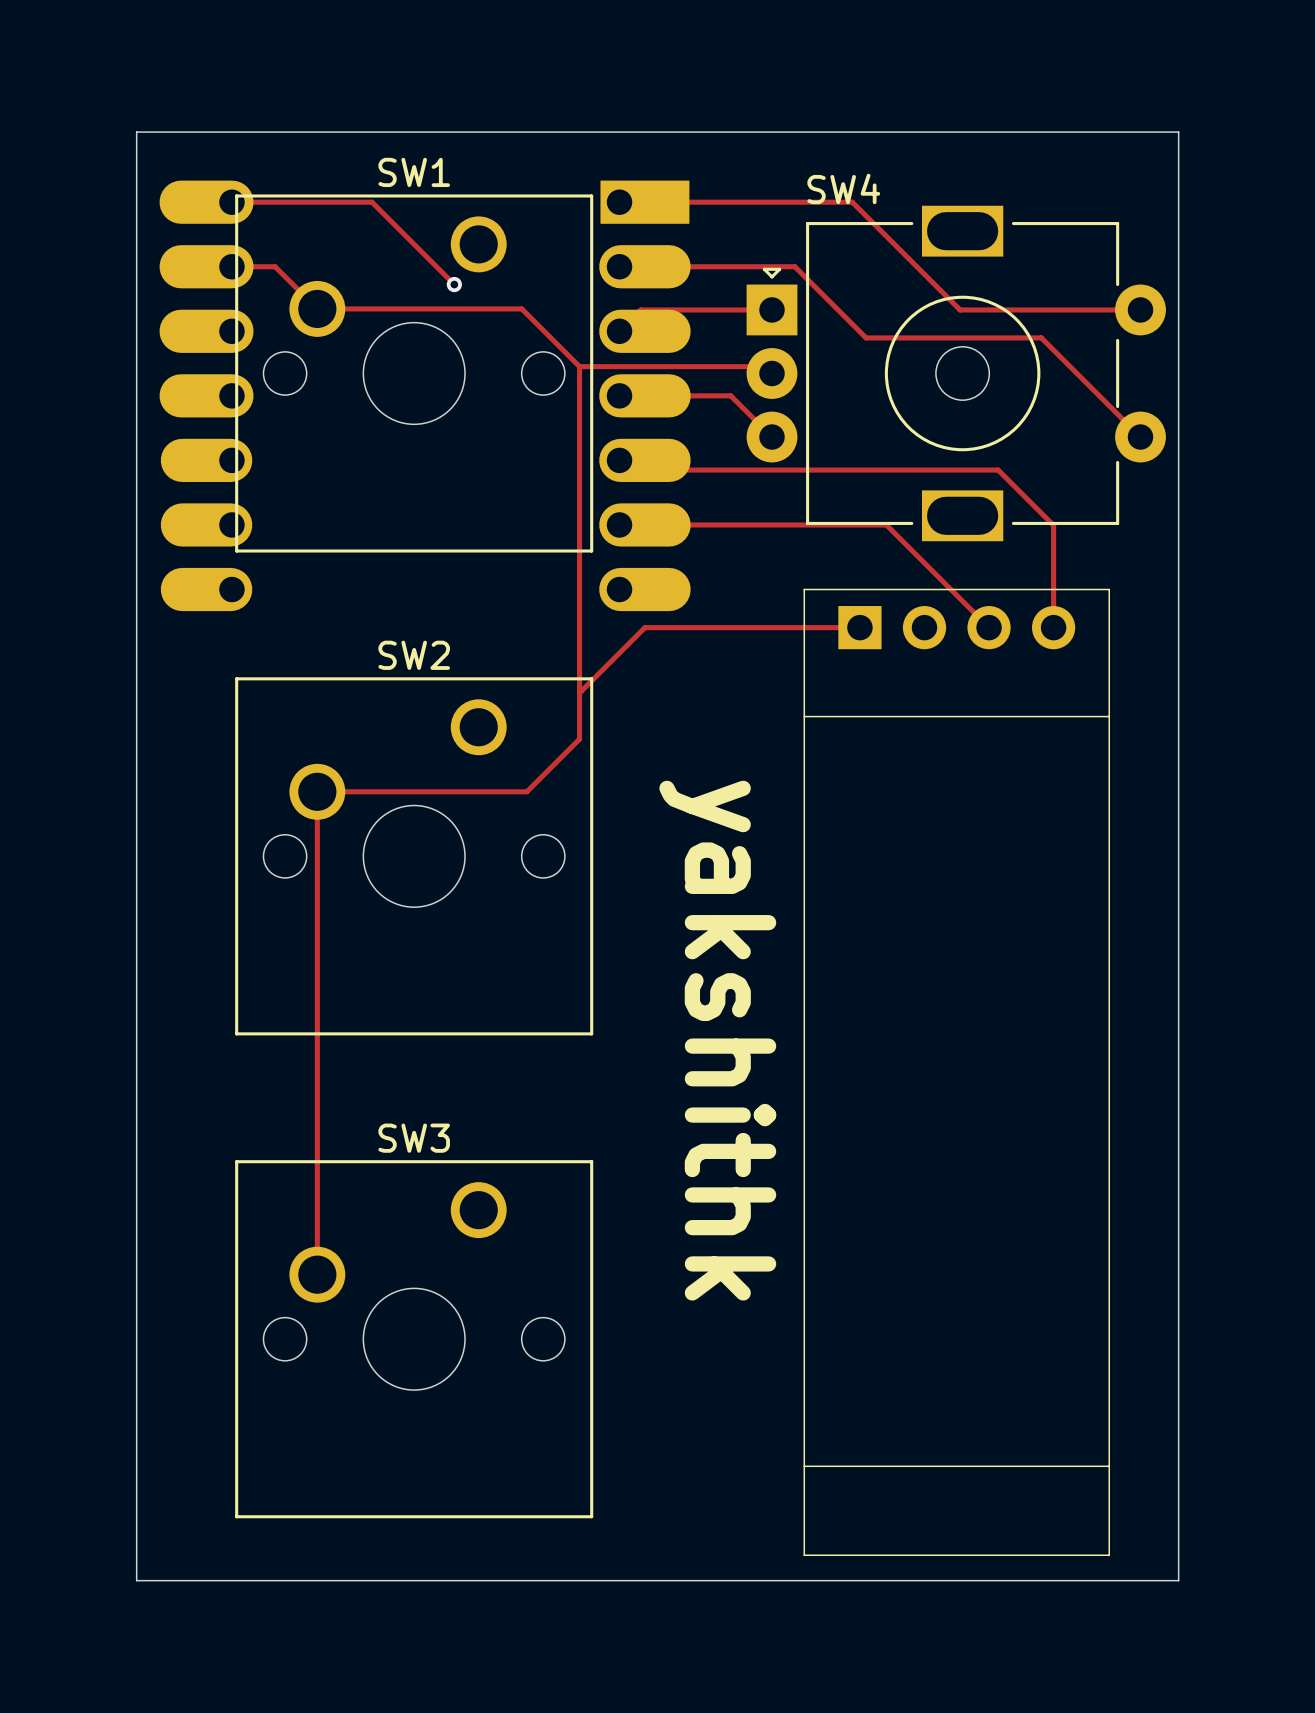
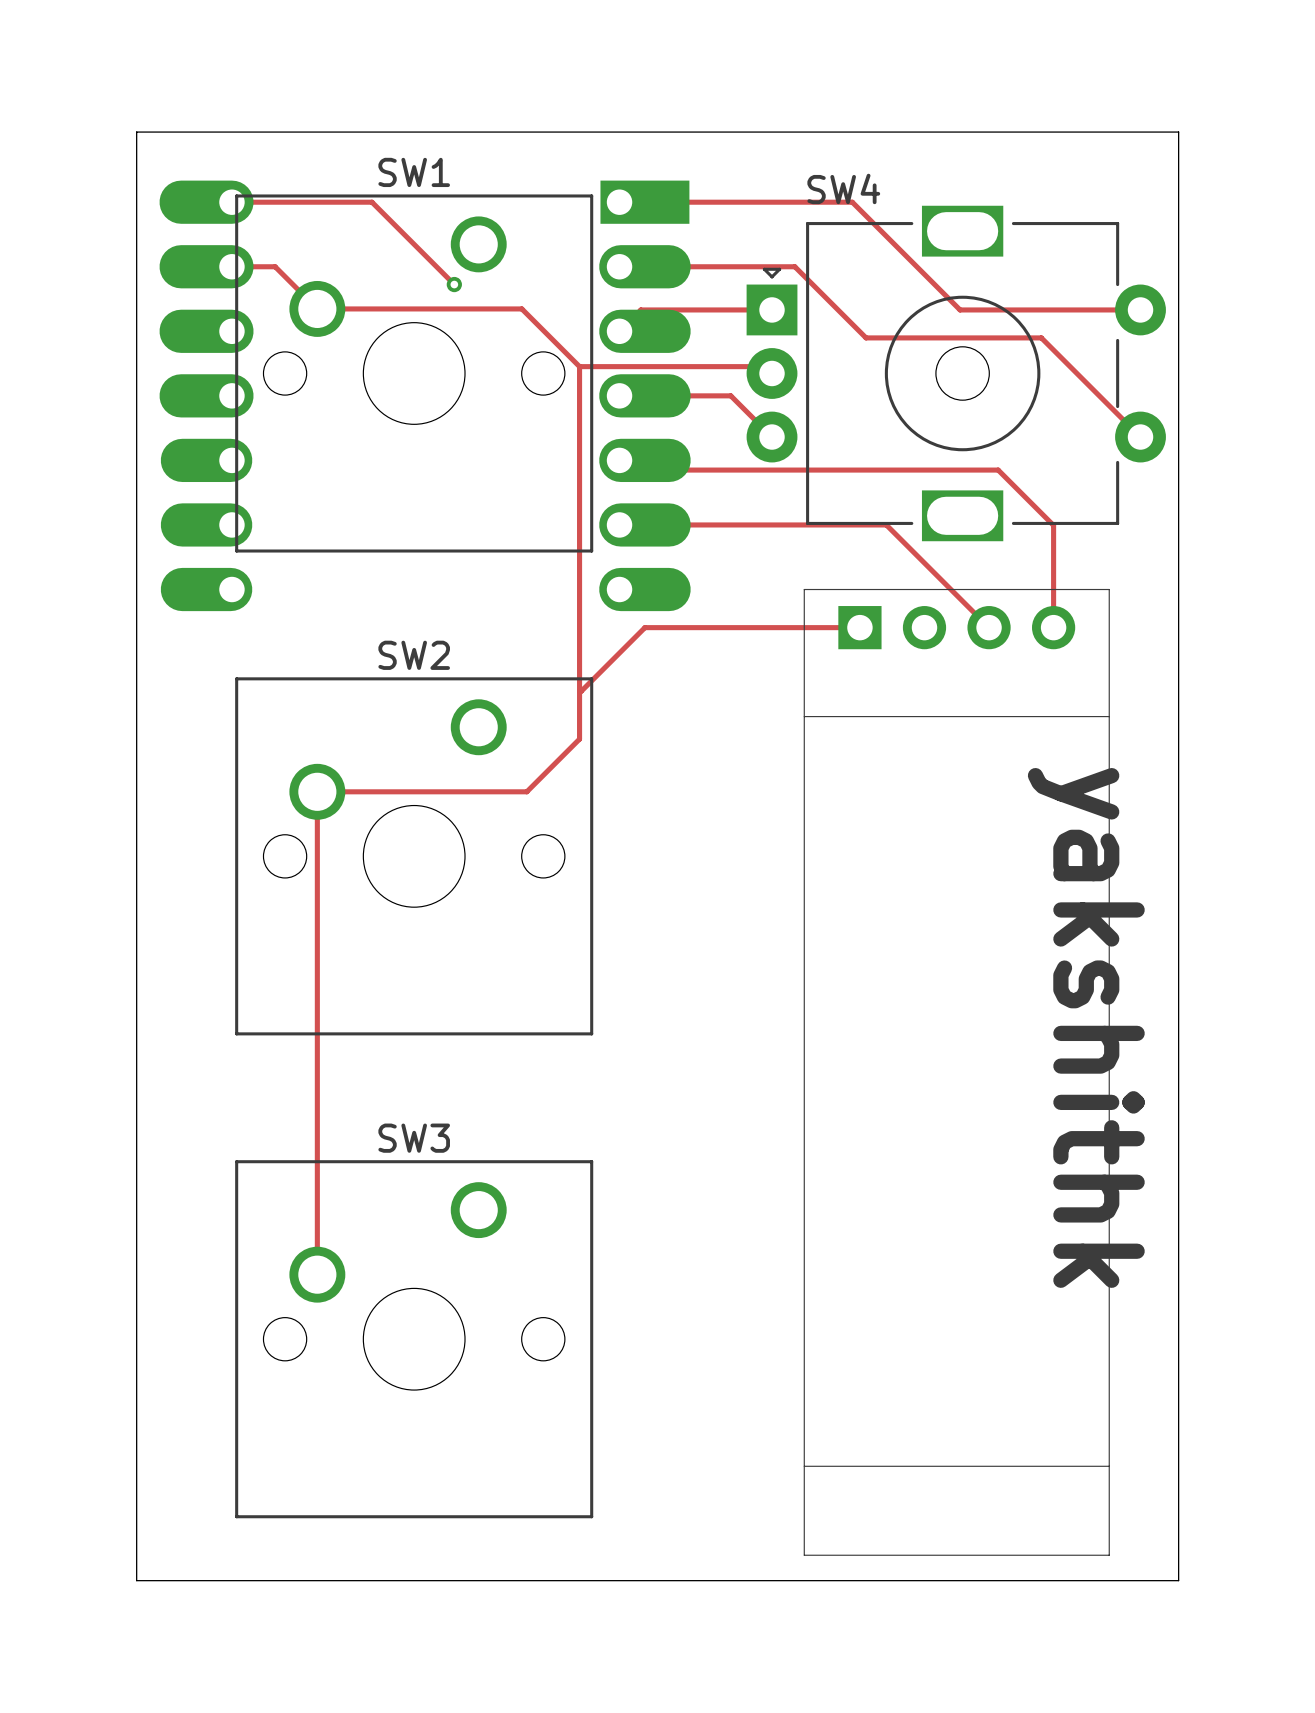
text position: yakshithk (717, 1040) -> yakshithk (1086, 1027)

